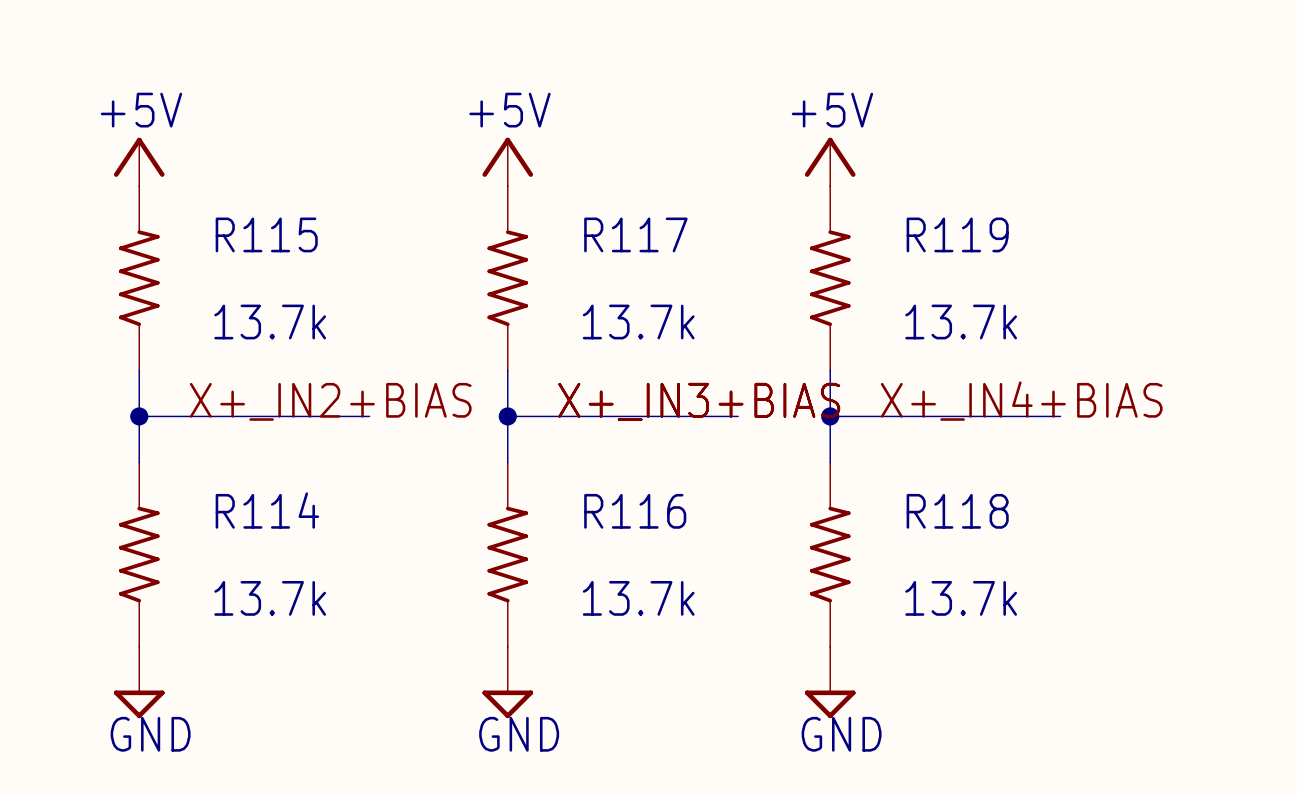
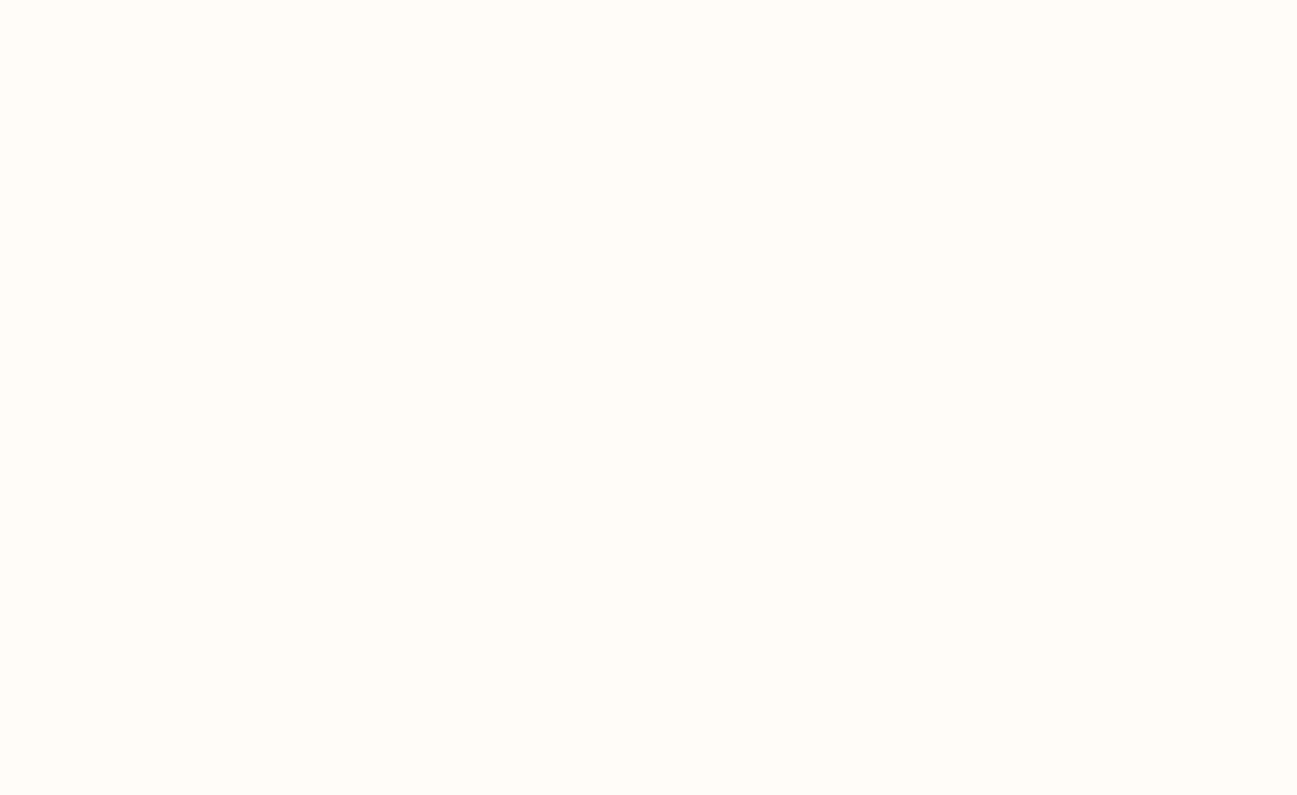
power symbol: +5V (139, 161) -> none
power symbol: +5V (507, 161) -> none
power symbol: +5V (830, 161) -> none
R115: 13.7k (139, 278) -> none
R117: 13.7k (507, 278) -> none
R119: 13.7k (830, 278) -> none
wire: (139, 370) (139, 462) -> none
wire: (507, 370) (507, 462) -> none
wire: (830, 370) (830, 462) -> none
label: X+_IN2+BIAS (330, 401) -> none
label: X+_IN3+BIAS (699, 401) -> none
label: X+_IN4+BIAS (1021, 401) -> none
wire: (139, 416) (369, 416) -> none
junction: (139, 416) -> none
wire: (507, 416) (738, 416) -> none
junction: (507, 416) -> none
wire: (830, 416) (1060, 416) -> none
junction: (830, 416) -> none
R114: 13.7k (139, 554) -> none
R116: 13.7k (507, 554) -> none
R118: 13.7k (830, 554) -> none
power symbol: GND (139, 682) -> none
power symbol: GND (507, 682) -> none
power symbol: GND (830, 682) -> none

